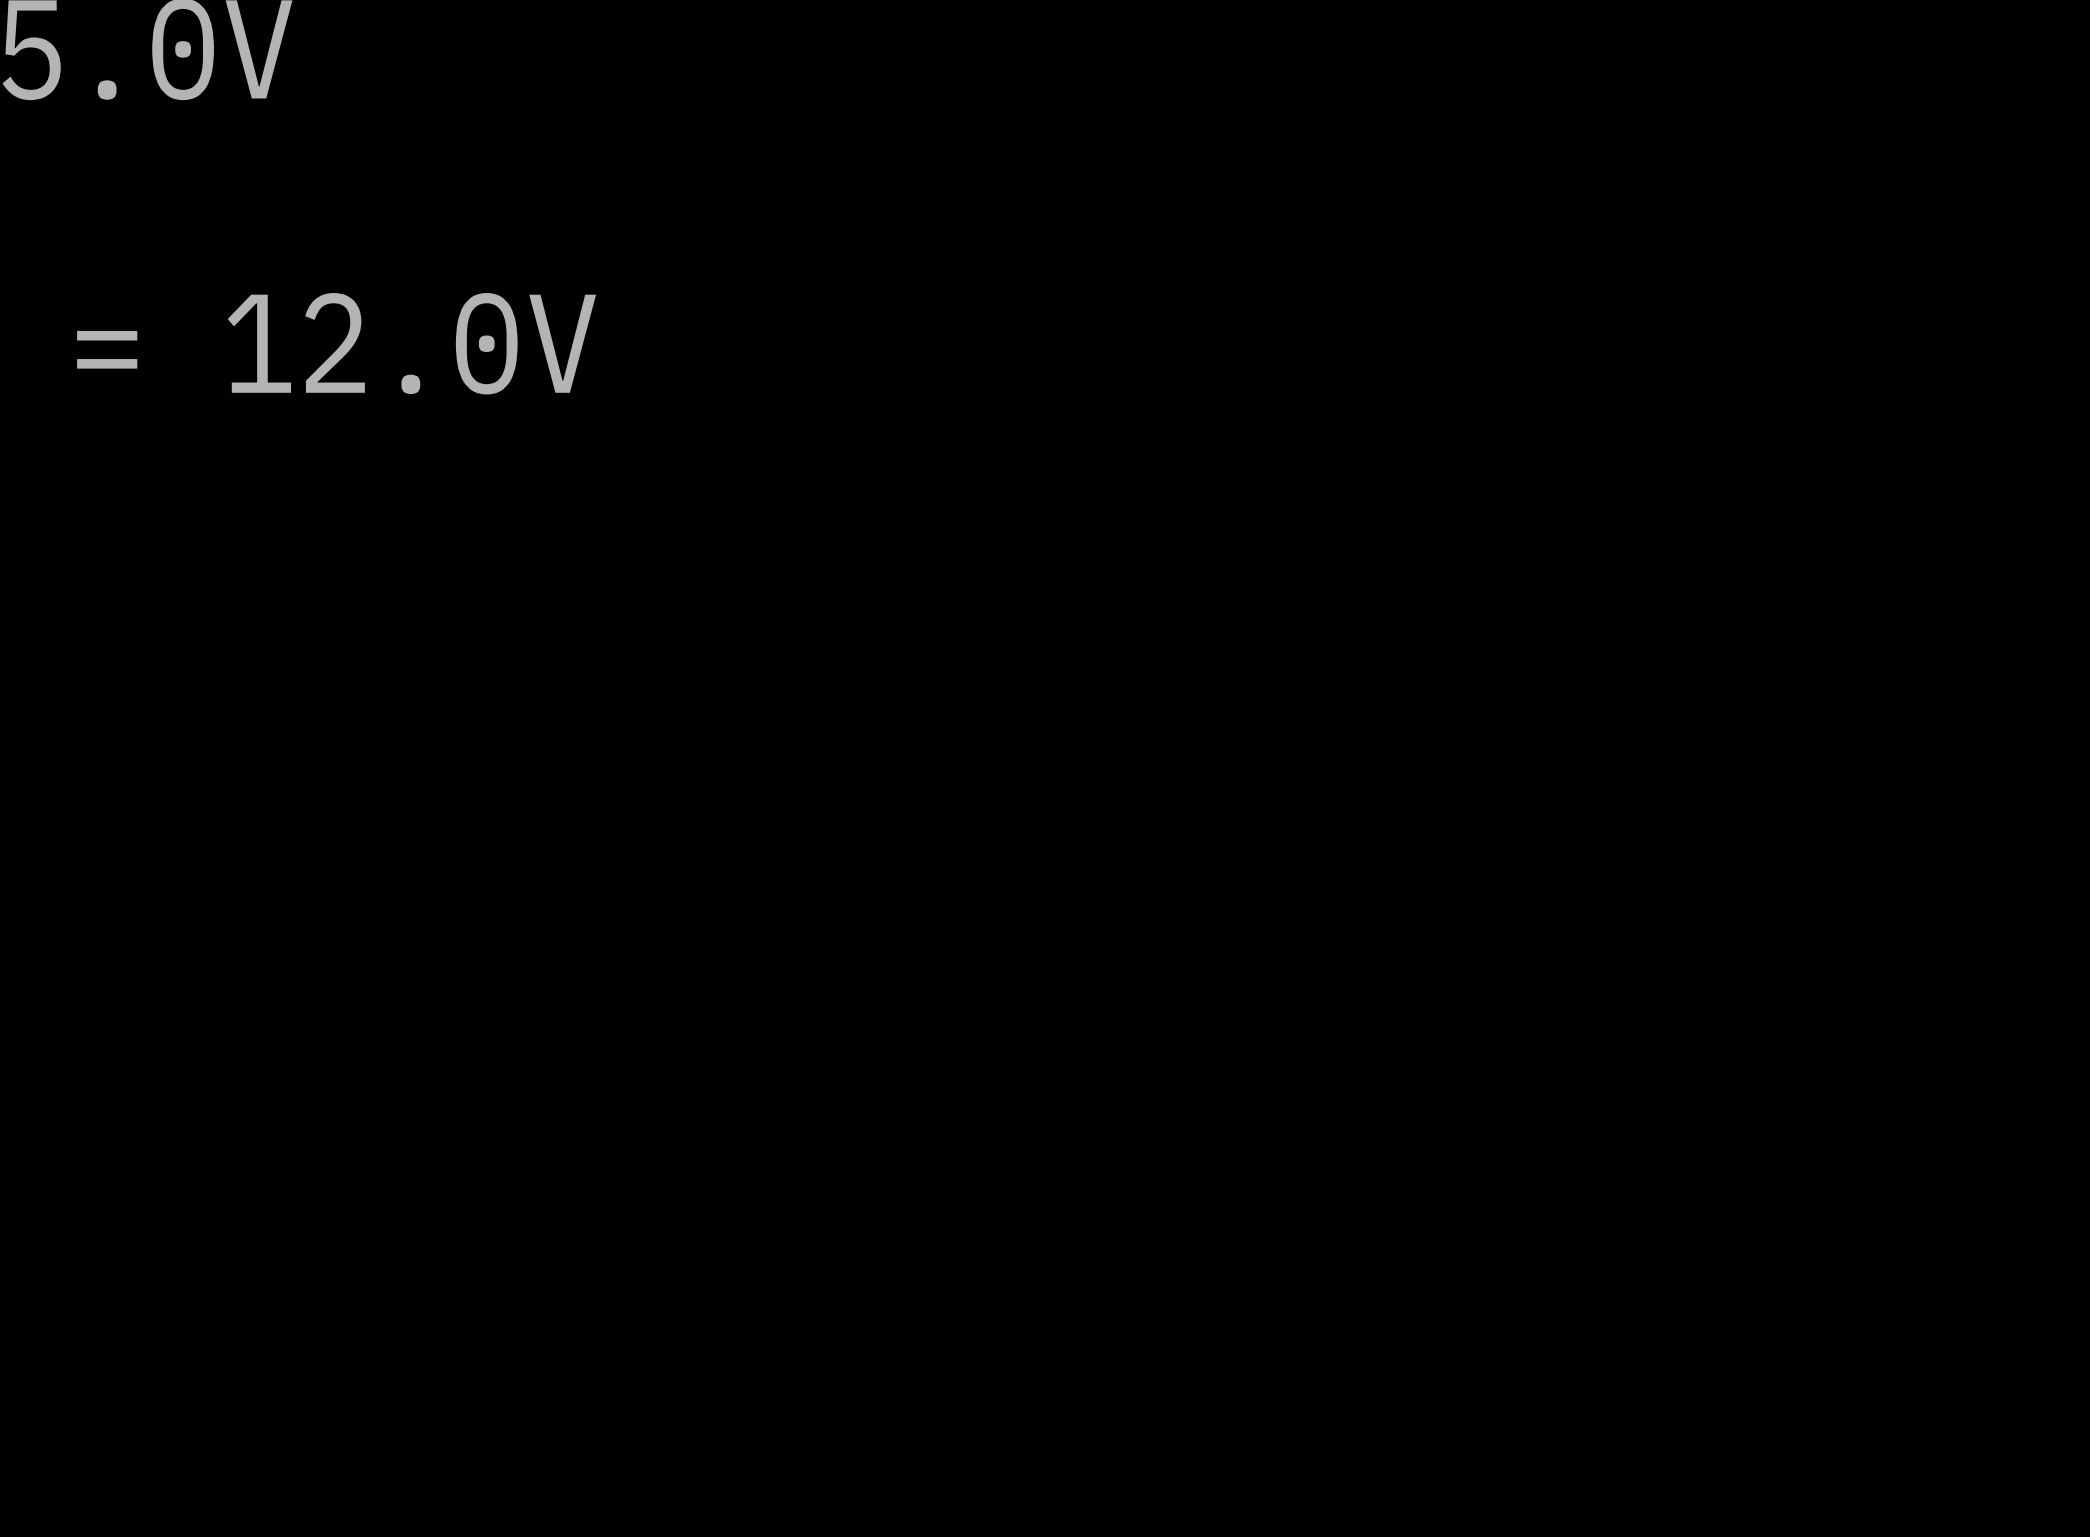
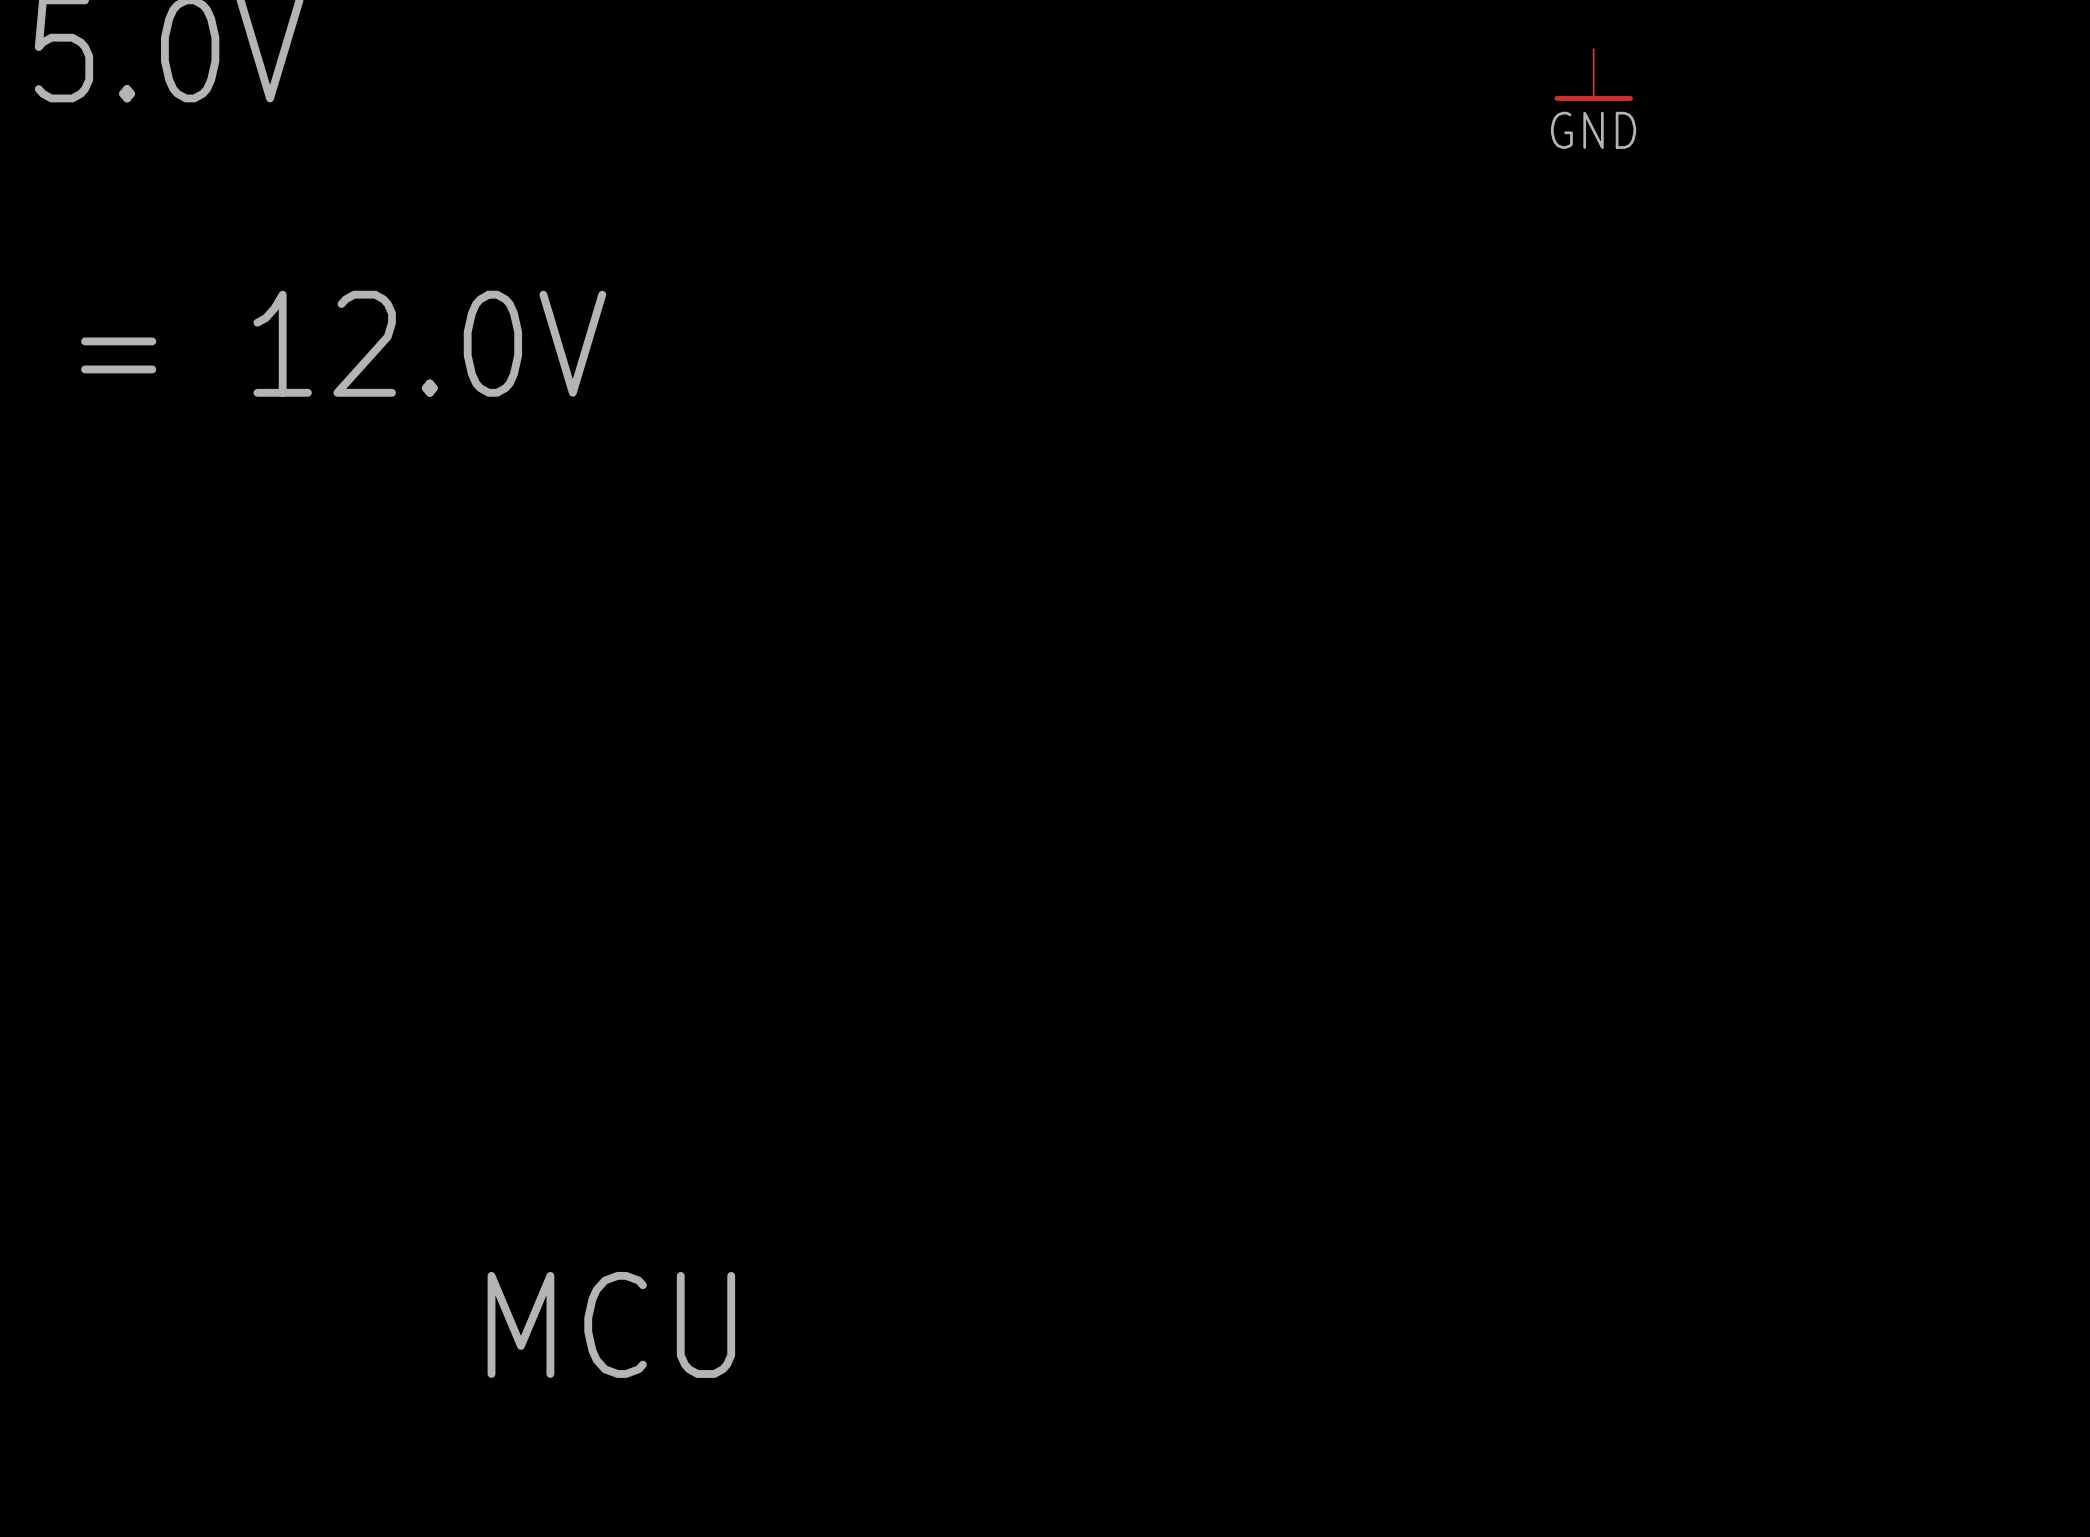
power symbol: none -> GND (1593, 75)
text: none -> MCU (611, 1324)

